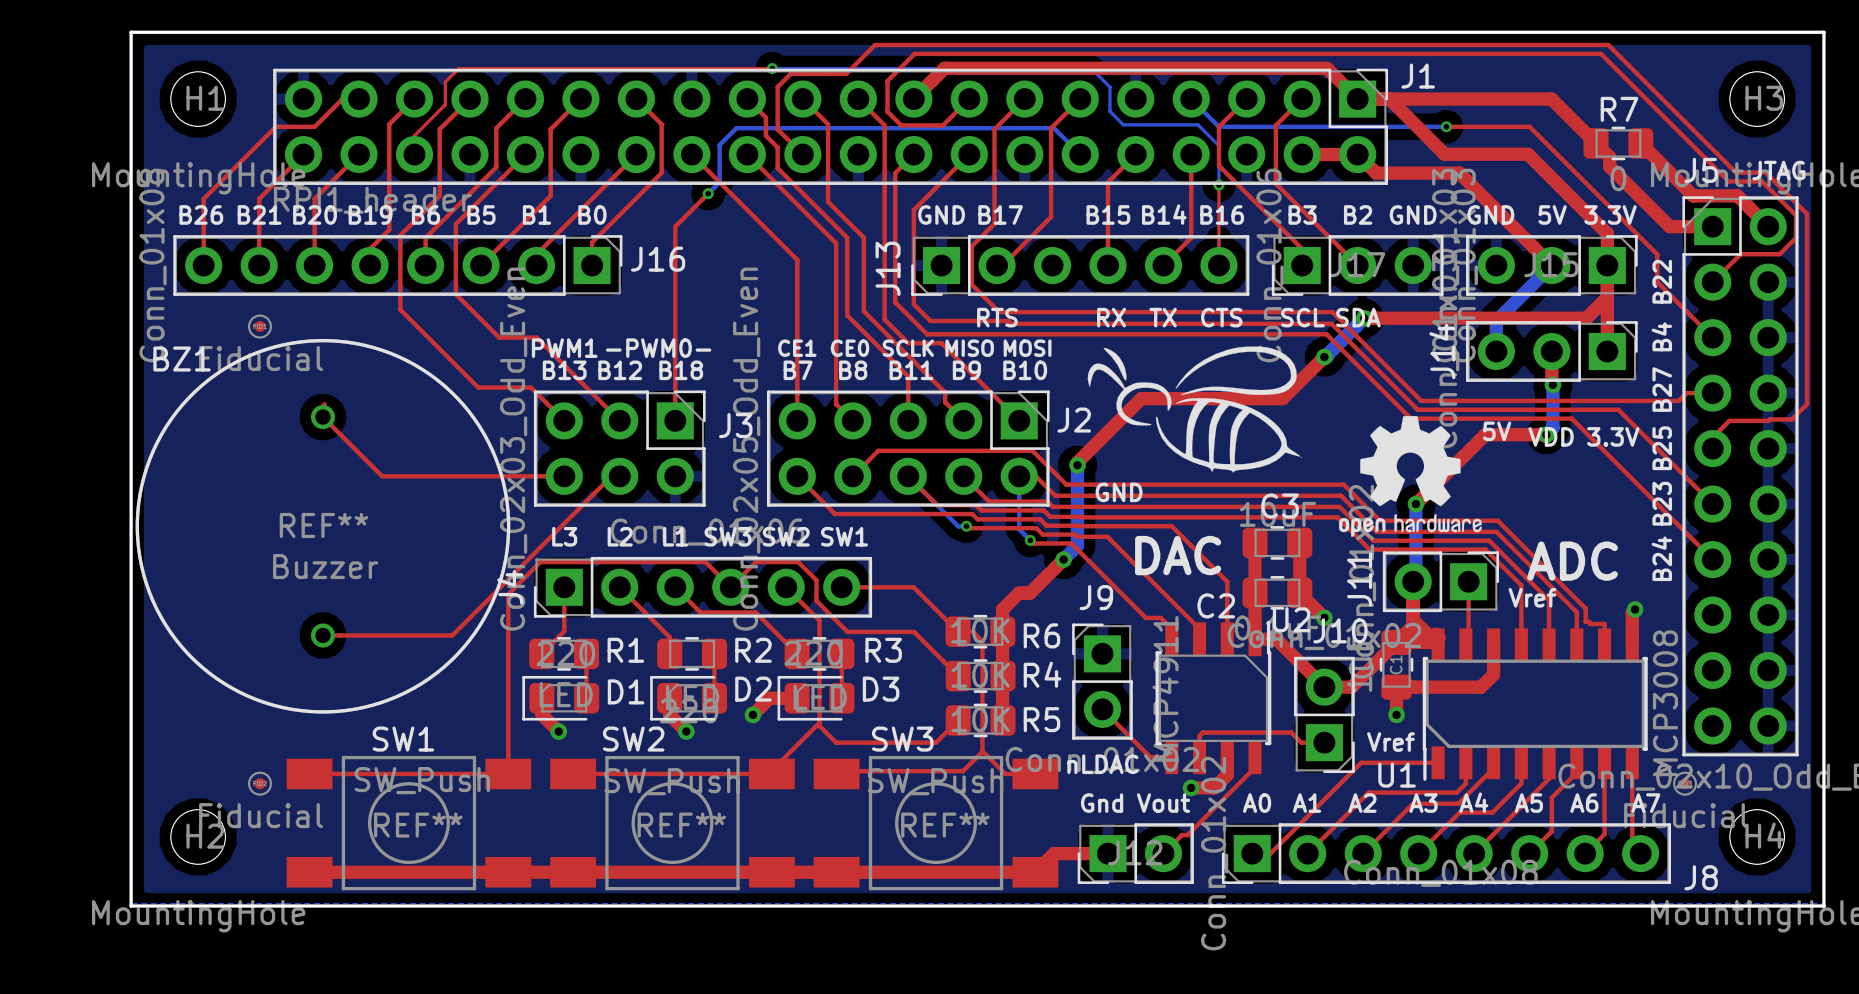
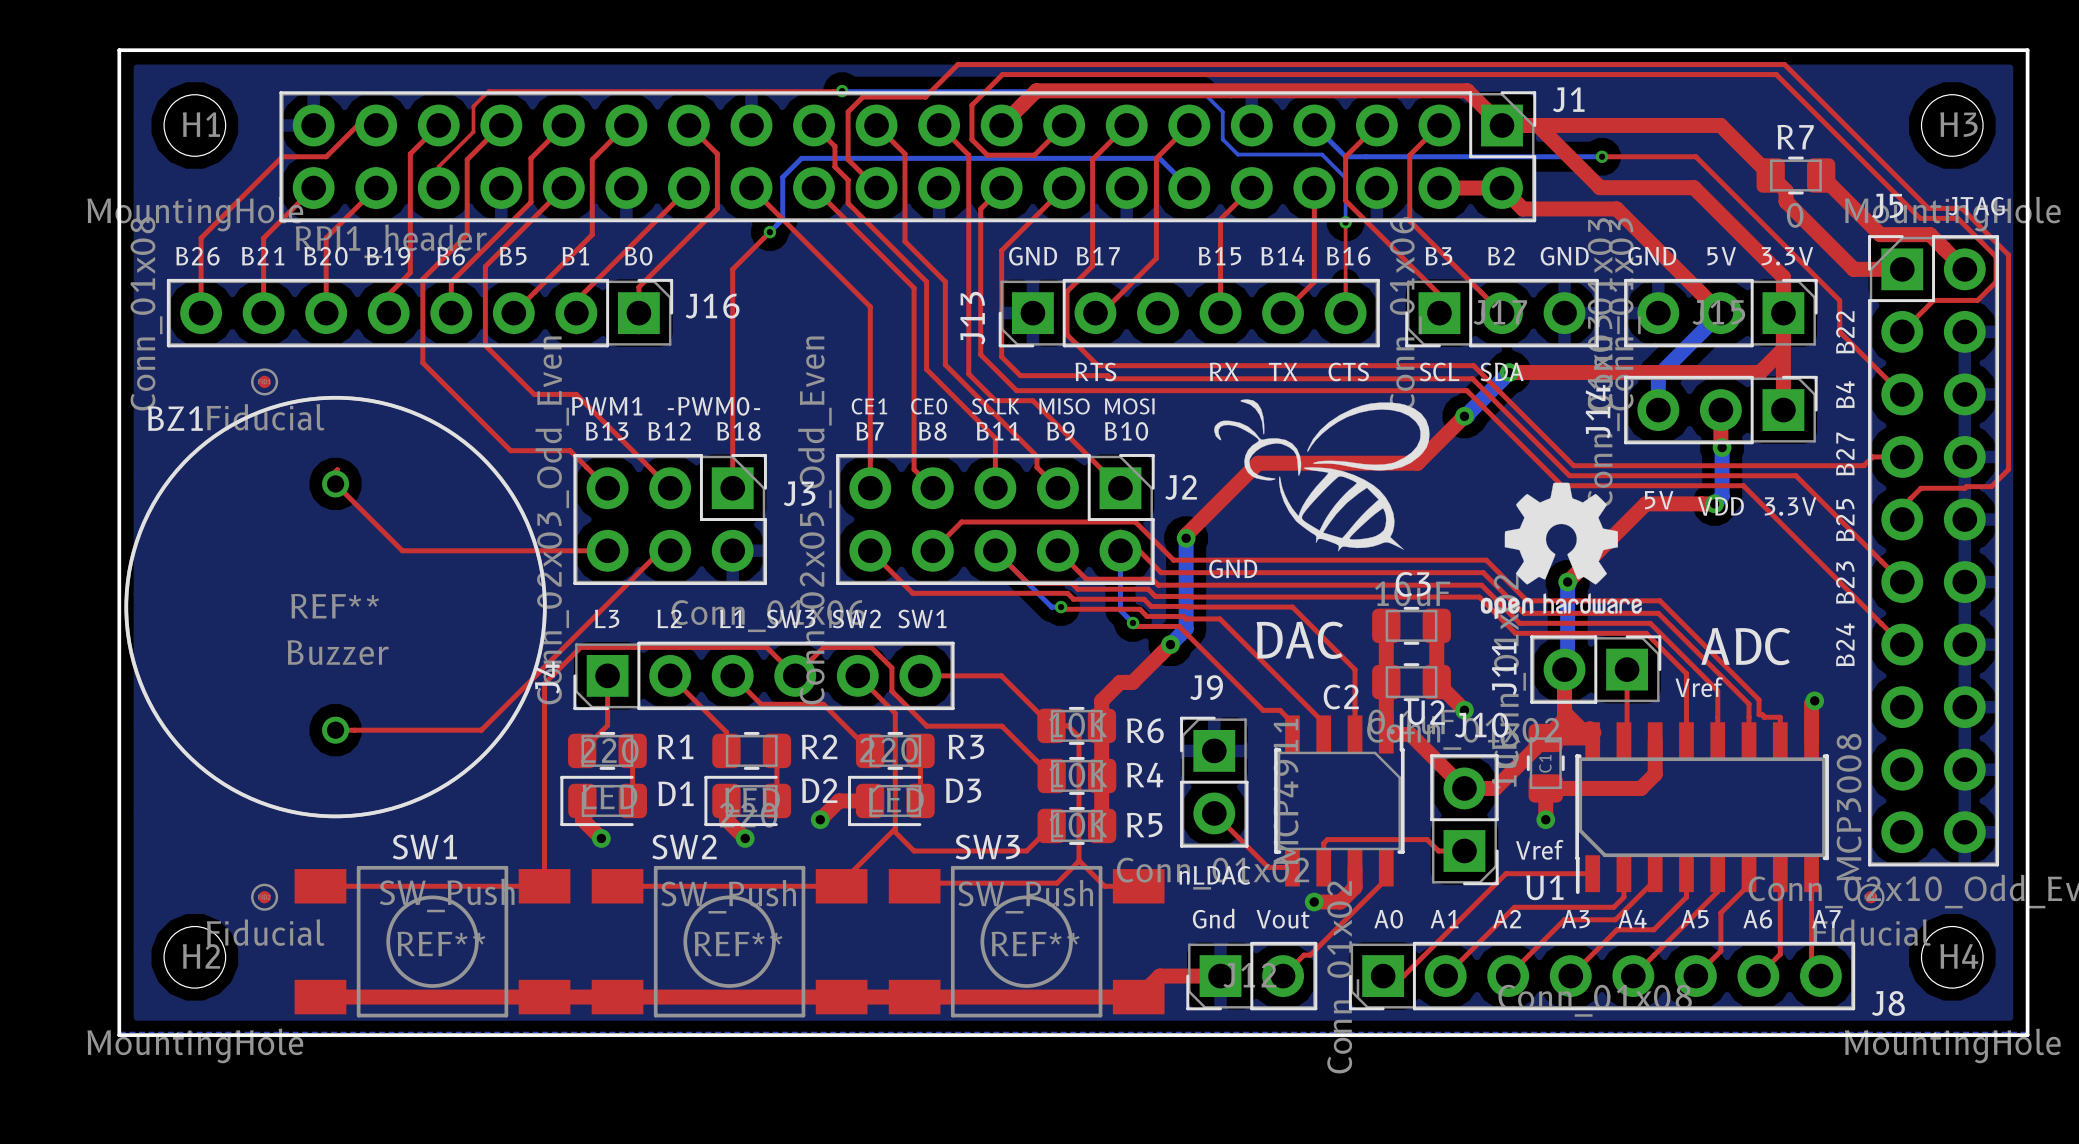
drawing shape: [1087, 346, 1303, 473] -> [1214, 399, 1430, 552]

